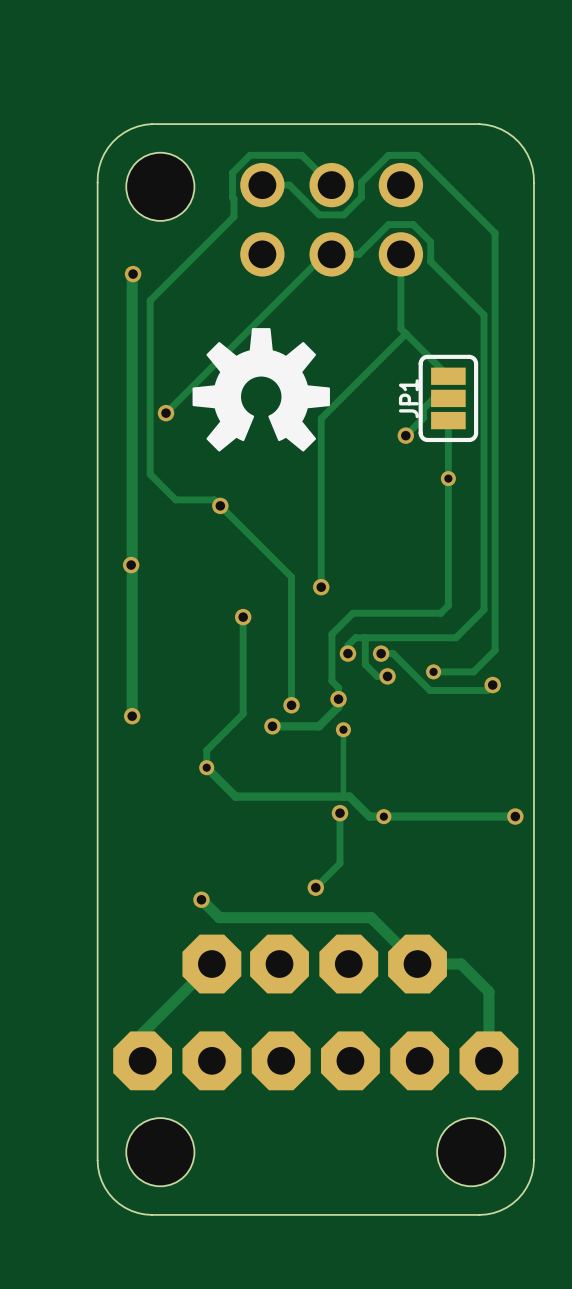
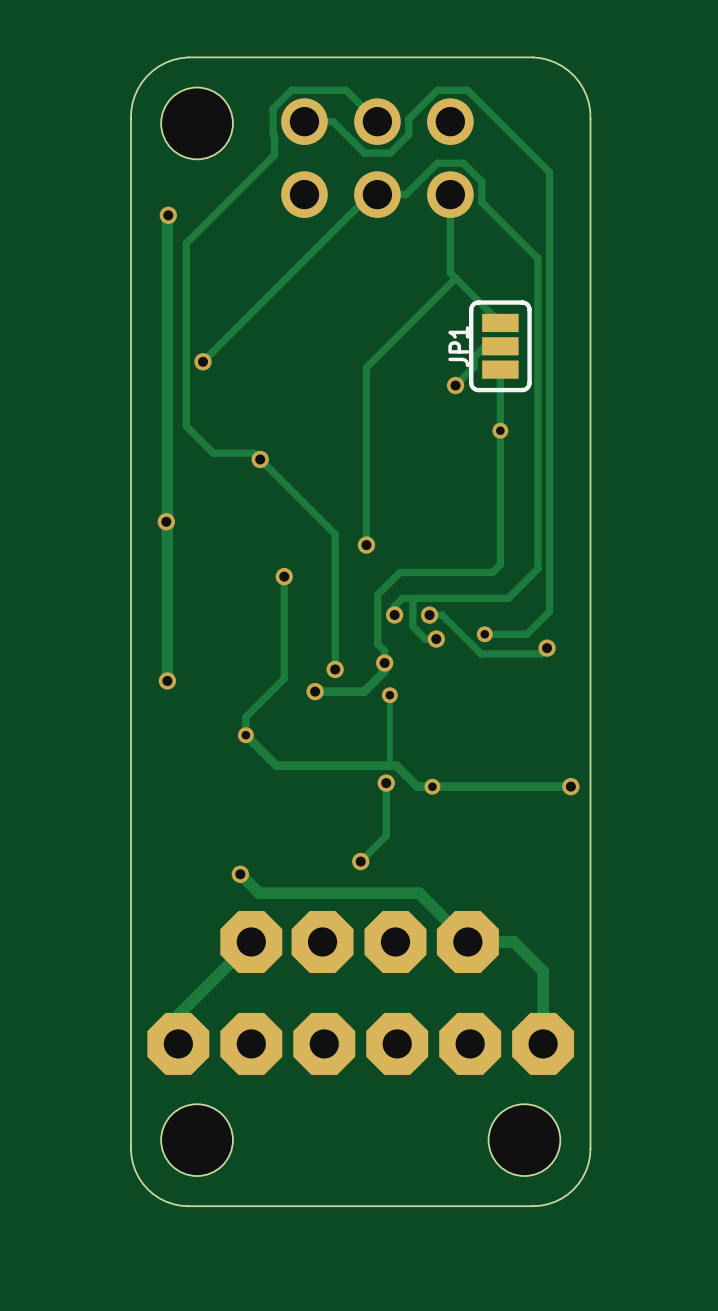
drawing: [192, 328, 330, 452] -> none

